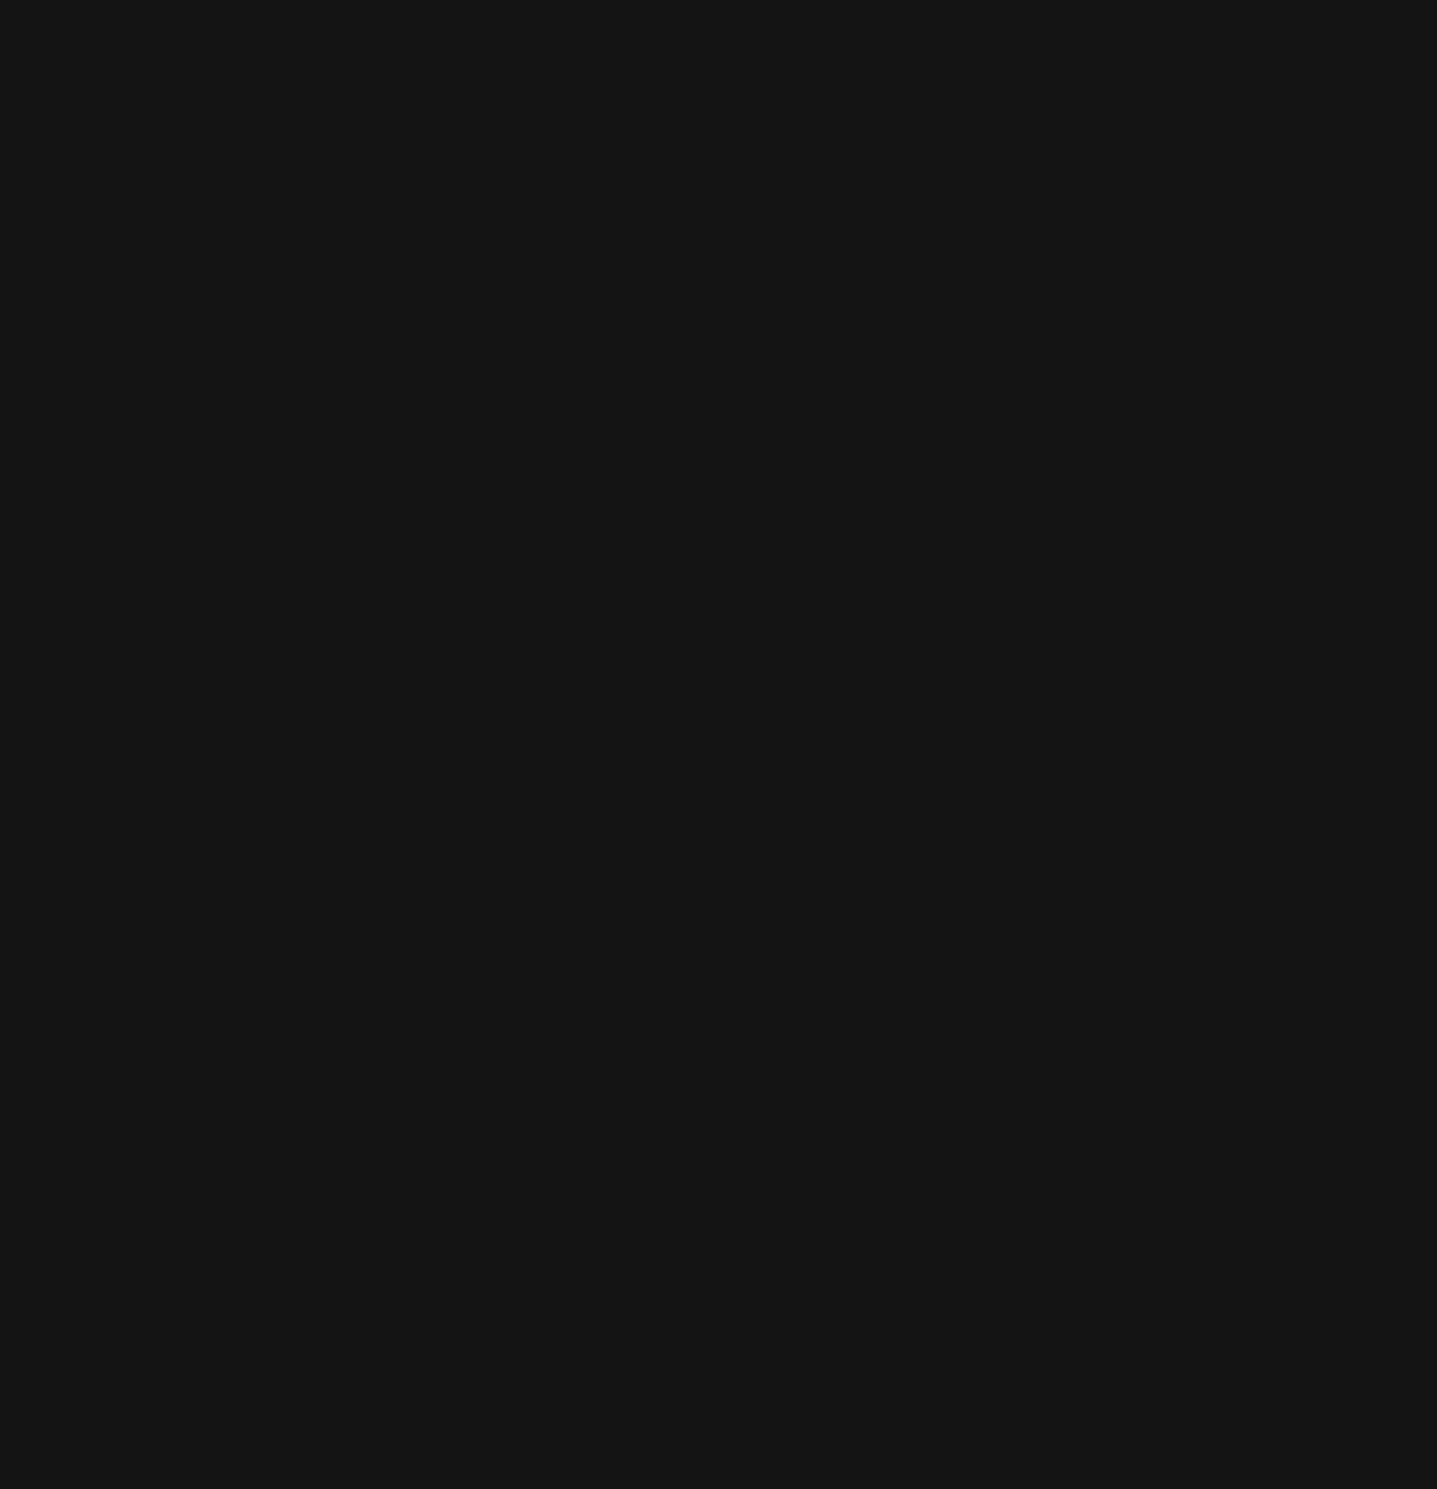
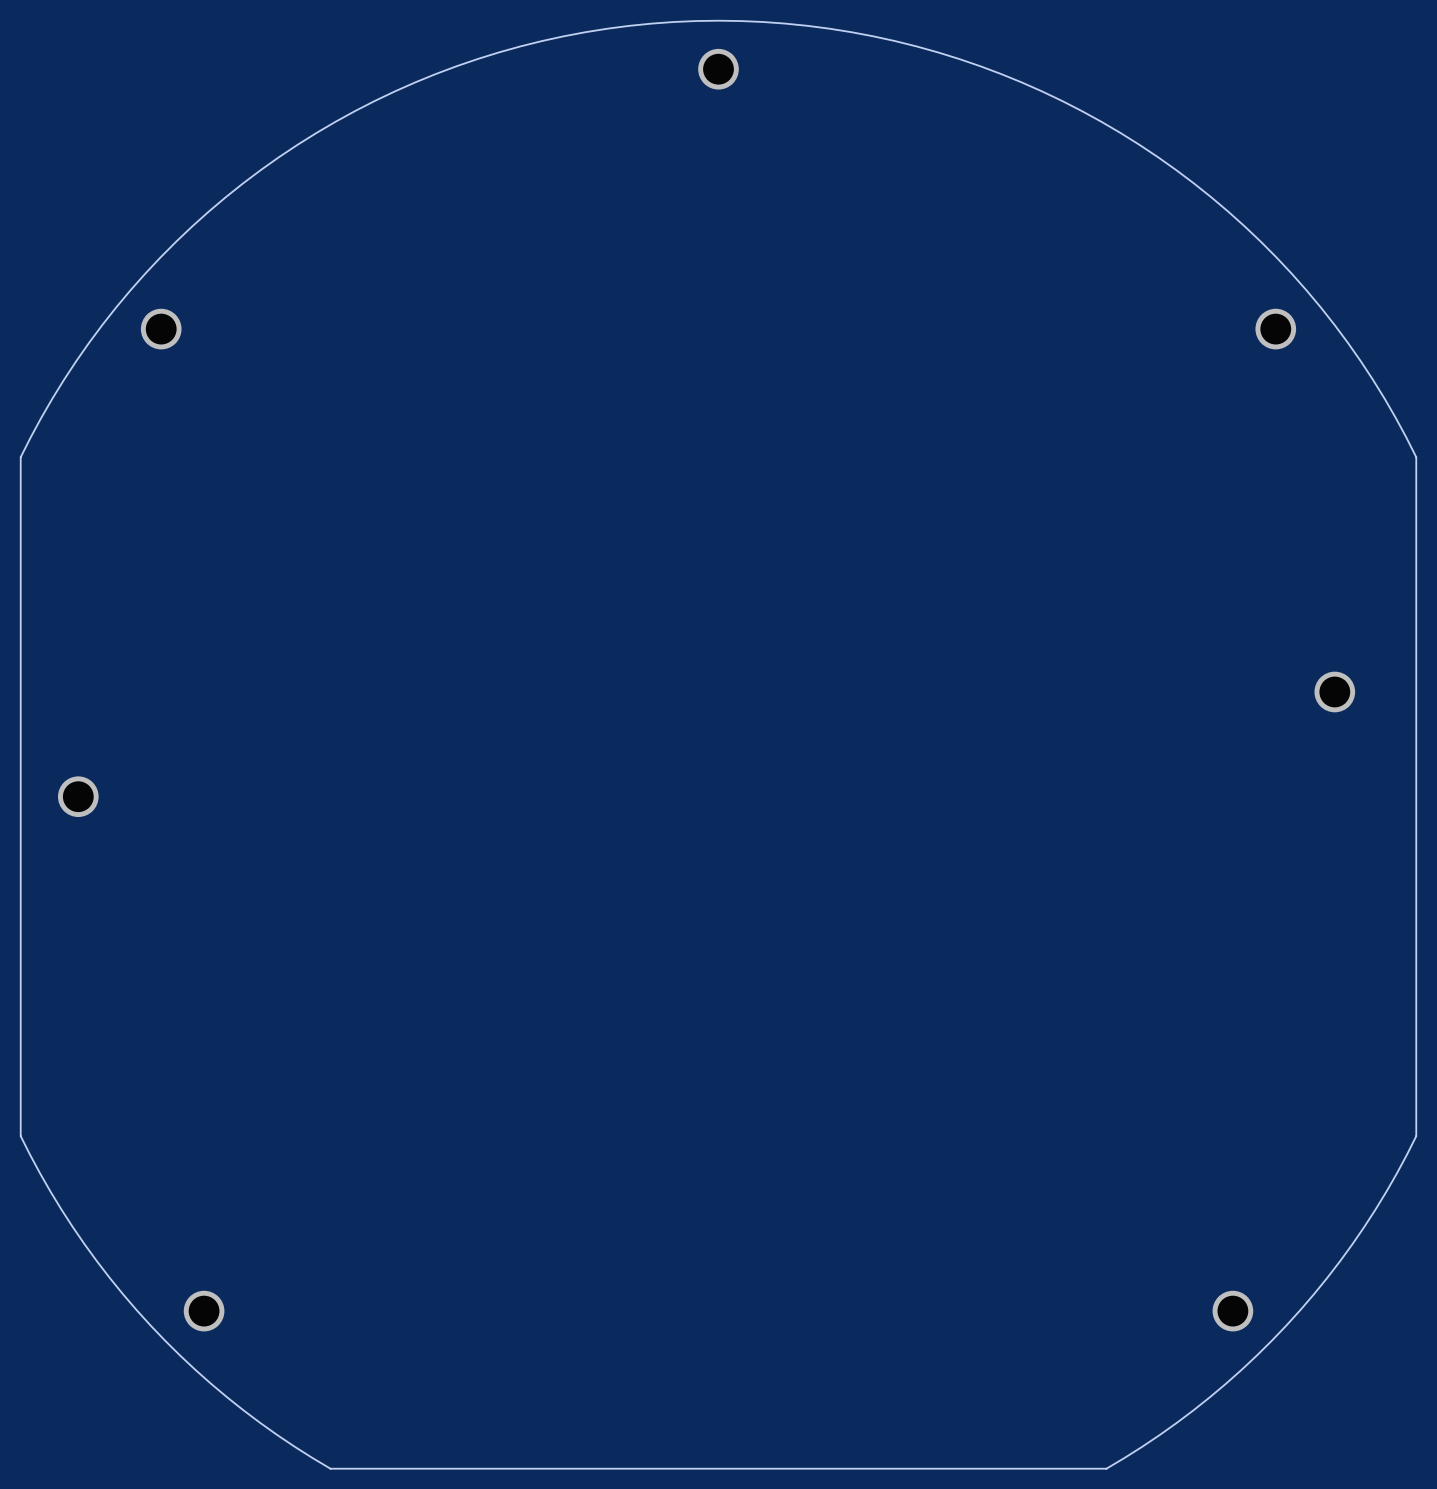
via: none -> (718, 69)
via: none -> (161, 329)
via: none -> (1275, 329)
board edge: none -> (1416, 457) (1416, 1136) (1396, 1173) (1364, 1227) (1327, 1277) (1286, 1325) (1241, 1369) (1193, 1410) (1142, 1446) (1106, 1468) (330, 1468) (277, 1435) (227, 1397) (180, 1355) (150, 1325) (109, 1277) (72, 1227) (50, 1191) (20, 1136) (20, 457) (52, 398) (89, 342) (130, 290) (176, 241) (225, 197) (260, 169) (316, 132) (374, 100) (435, 73) (520, 46) (607, 28) (674, 21) (762, 21) (829, 28) (894, 41) (959, 58) (1021, 82) (1101, 121) (1176, 169) (1228, 211) (1276, 257) (1334, 324) (1384, 398) (1416, 457)
via: none -> (1334, 691)
via: none -> (78, 796)
via: none -> (204, 1311)
via: none -> (1232, 1311)

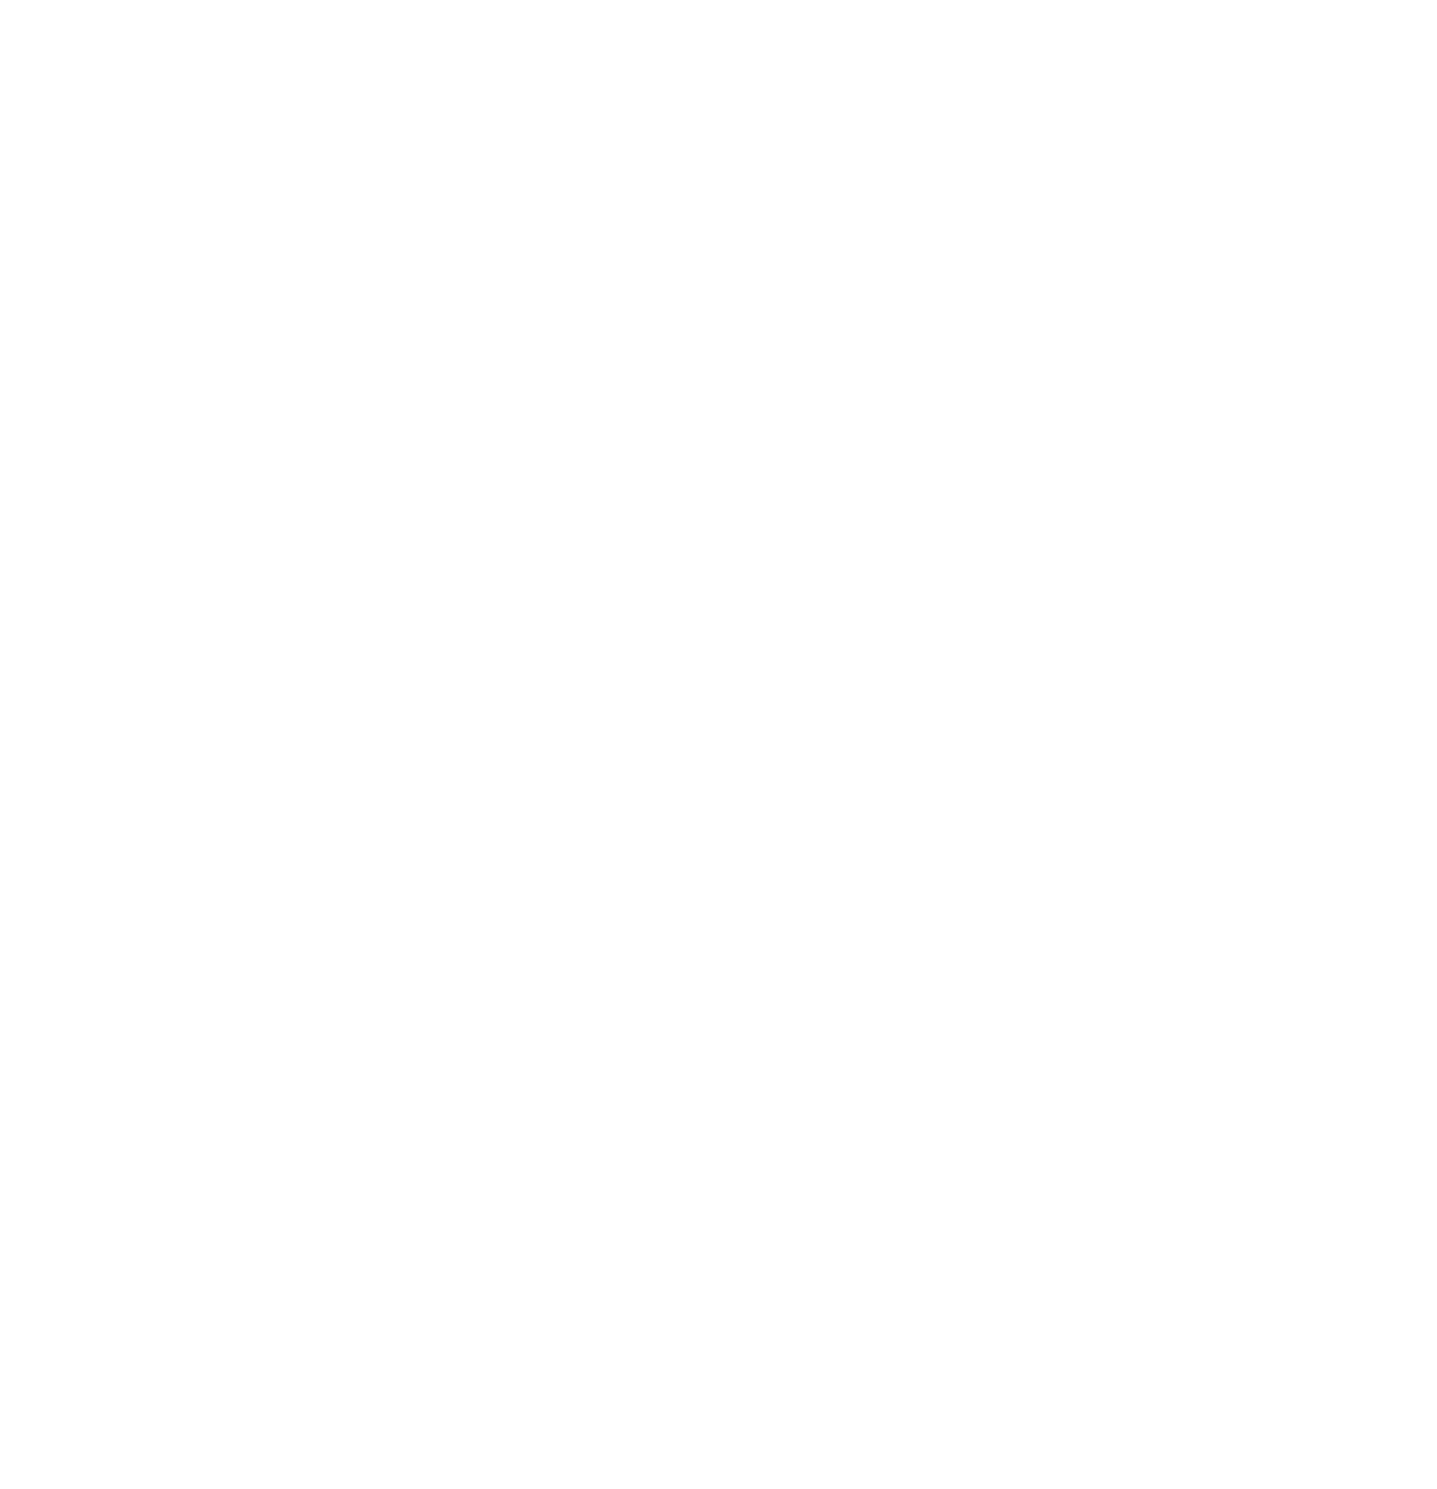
via: (718, 69) -> none
via: (161, 329) -> none
via: (1275, 329) -> none
board edge: (1416, 457) (1416, 1136) (1396, 1173) (1364, 1227) (1327, 1277) (1286, 1325) (1241, 1369) (1193, 1410) (1142, 1446) (1106, 1468) (330, 1468) (277, 1435) (227, 1397) (180, 1355) (150, 1325) (109, 1277) (72, 1227) (50, 1191) (20, 1136) (20, 457) (52, 398) (89, 342) (130, 290) (176, 241) (225, 197) (260, 169) (316, 132) (374, 100) (435, 73) (520, 46) (607, 28) (674, 21) (762, 21) (829, 28) (894, 41) (959, 58) (1021, 82) (1101, 121) (1176, 169) (1228, 211) (1276, 257) (1334, 324) (1384, 398) (1416, 457) -> none
via: (1334, 691) -> none
via: (78, 796) -> none
via: (204, 1311) -> none
via: (1232, 1311) -> none

